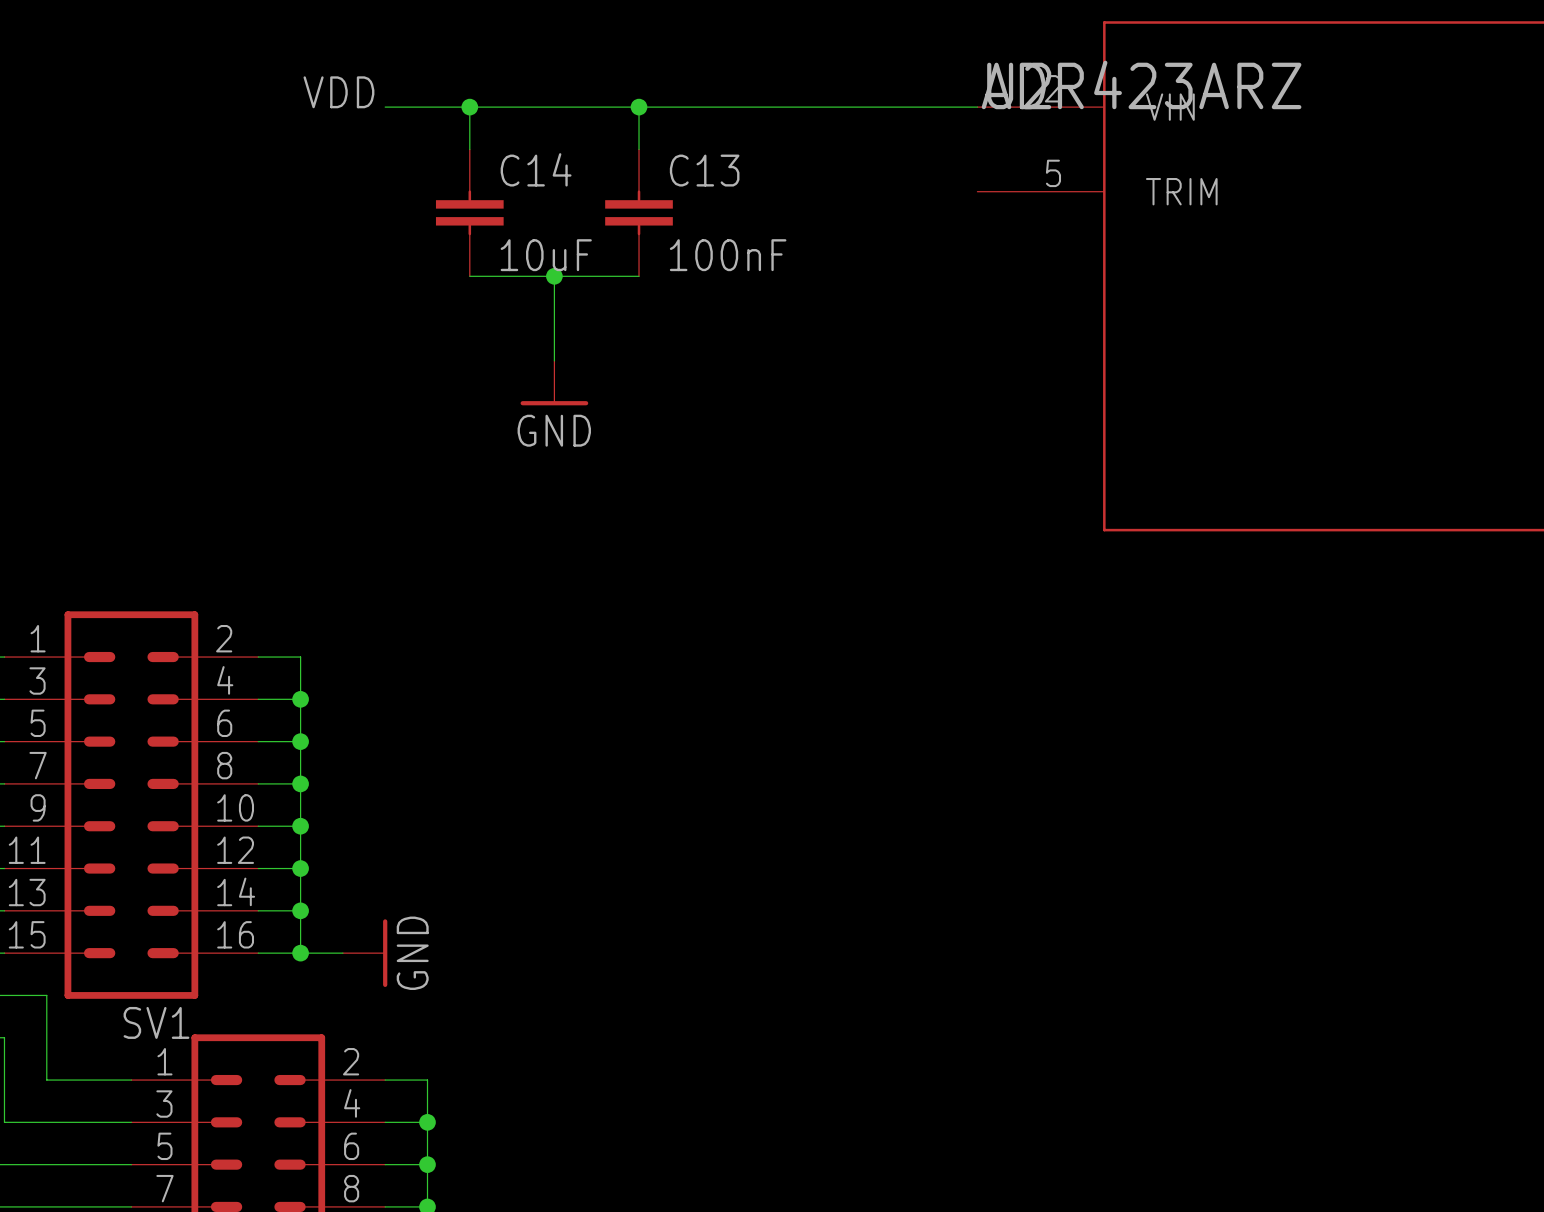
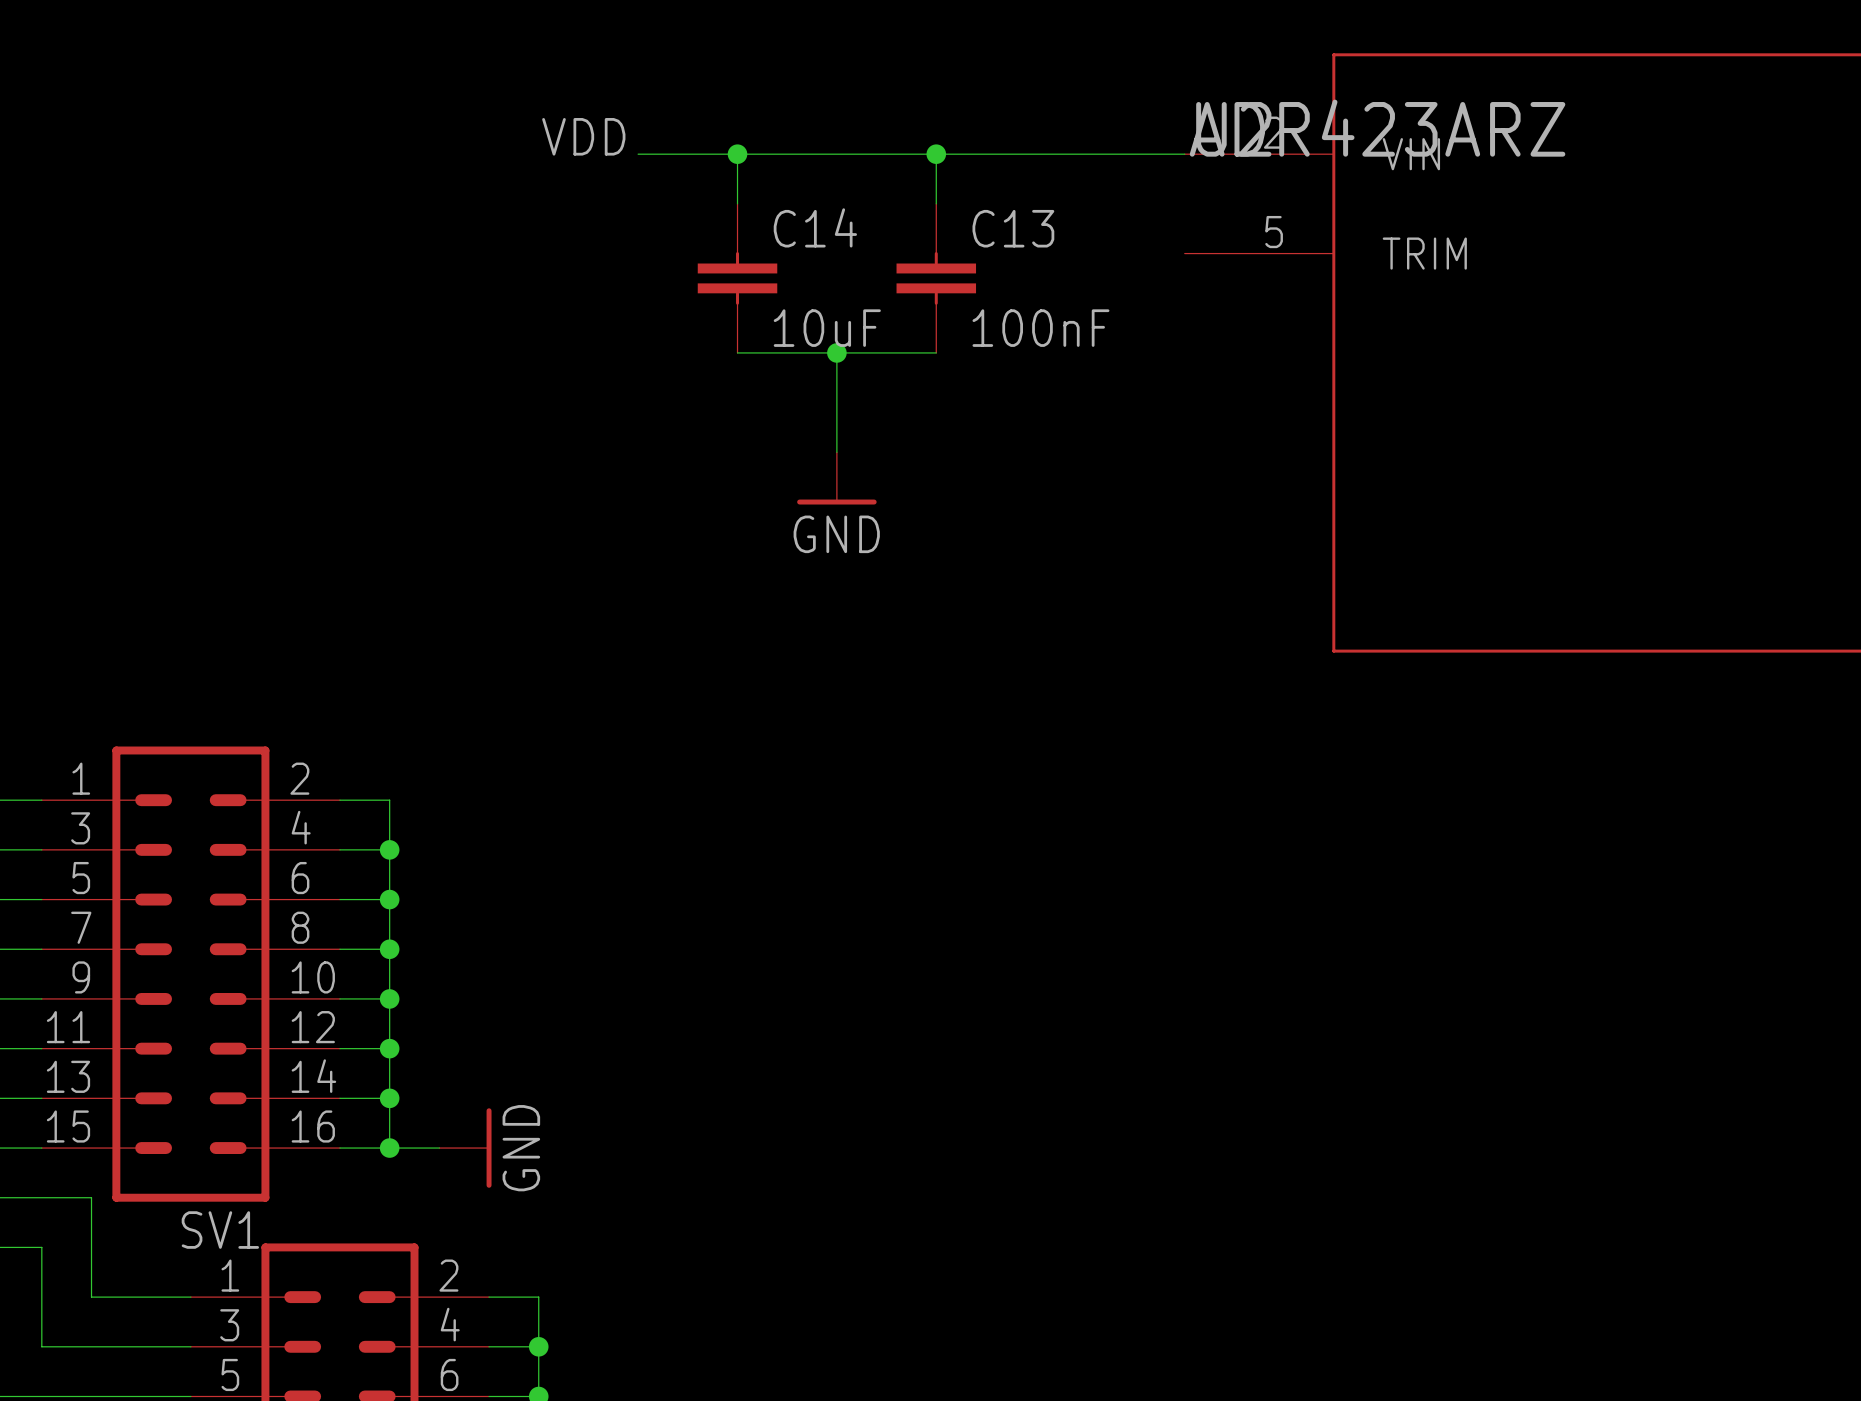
label position: VDD (338, 92) -> VDD (583, 136)
wire: (385, 107) (512, 107) -> none
wire: (469, 107) (469, 149) -> (737, 154) (737, 203)
junction: (469, 107) -> none
wire: (639, 107) (639, 149) -> (936, 154) (936, 203)
junction position: (639, 107) -> (737, 154)
junction: none -> (936, 154)
C14 position: (469, 212) -> (737, 278)
C13 position: (639, 212) -> (936, 278)
wire: (469, 276) (596, 276) -> (787, 352) (936, 352)
wire: (554, 276) (554, 360) -> (836, 352) (836, 452)
junction: (554, 276) -> none
junction: none -> (836, 352)
power symbol position: GND (554, 383) -> GND (836, 478)

